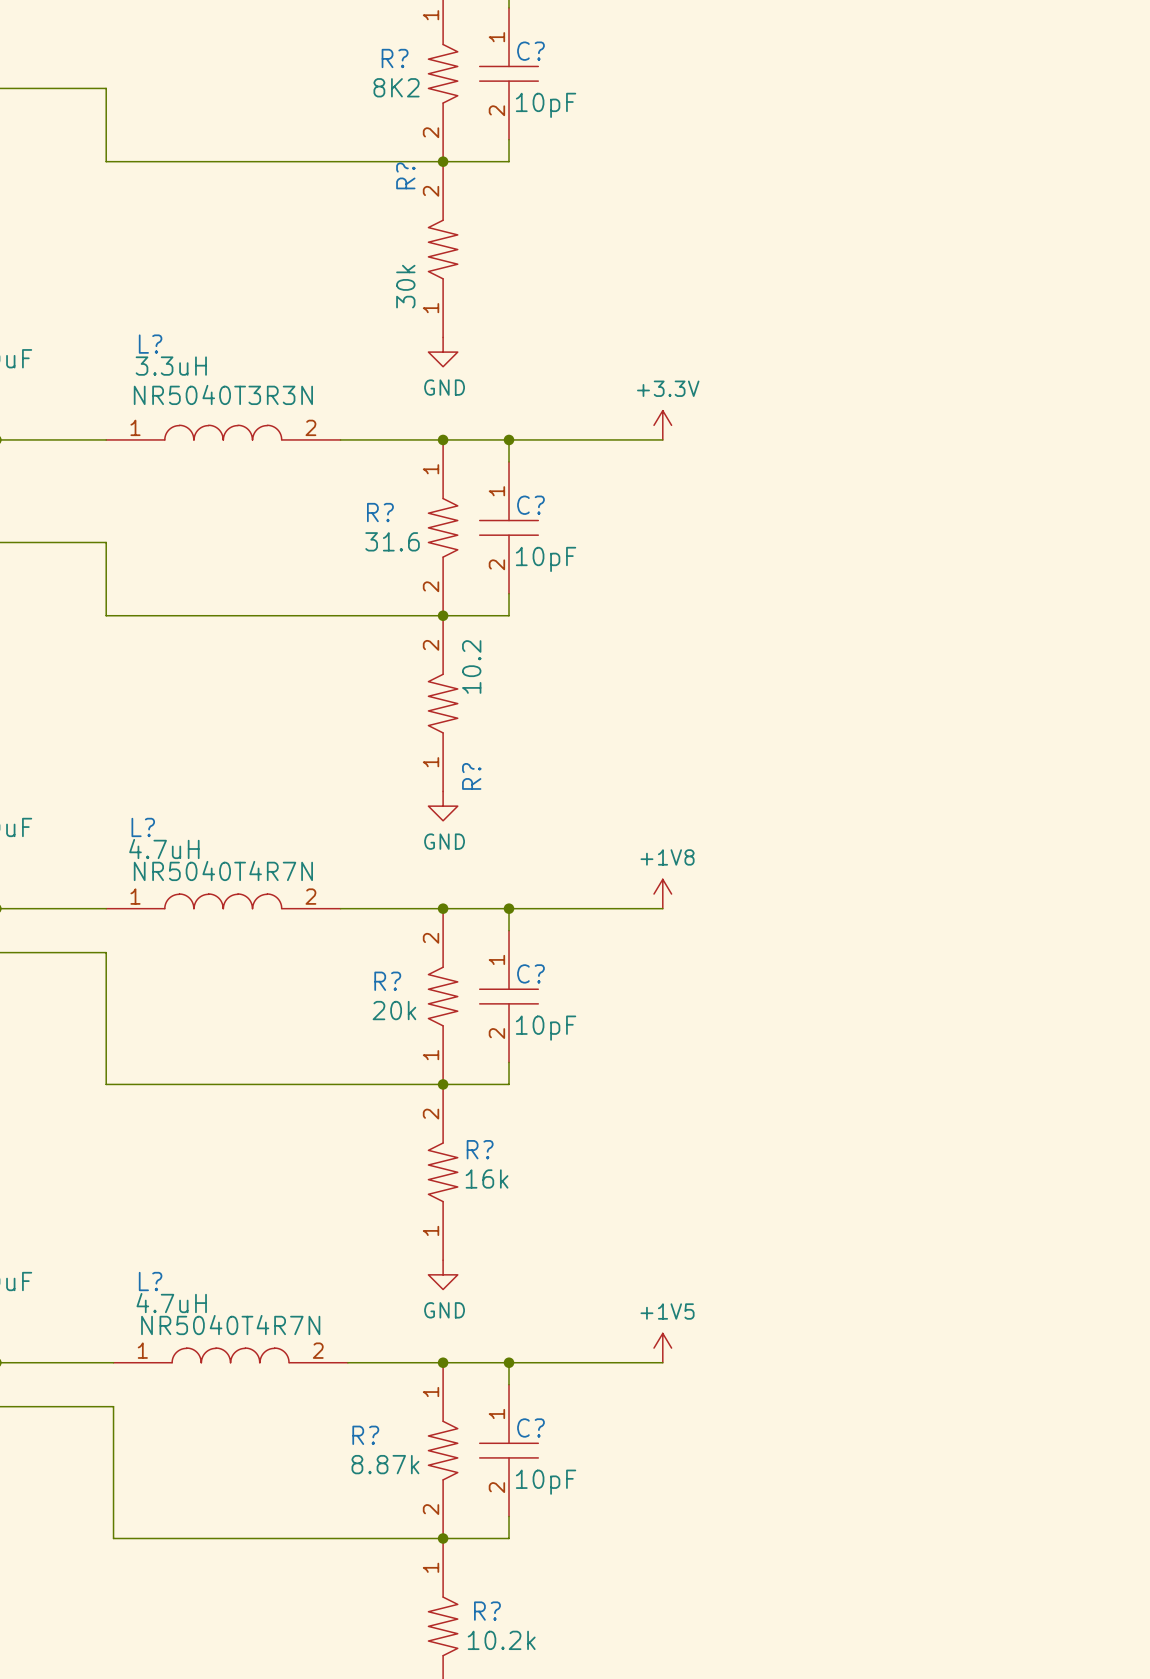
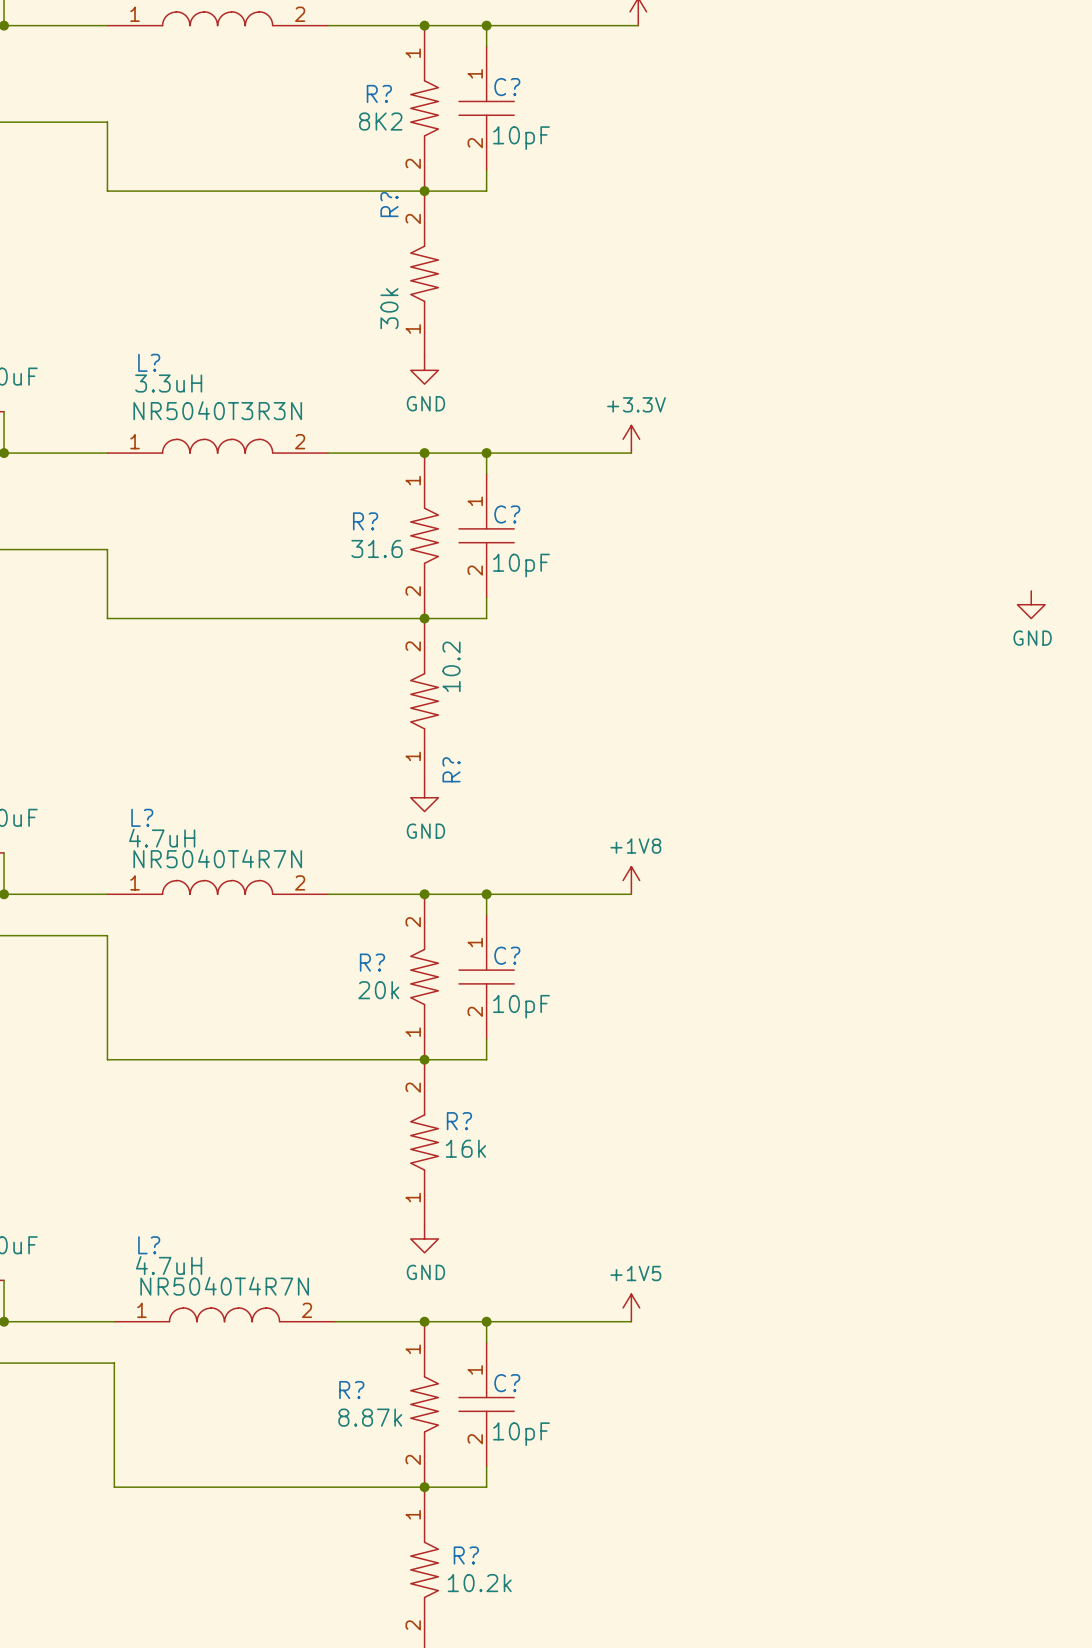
power symbol: none -> GND (1031, 604)

